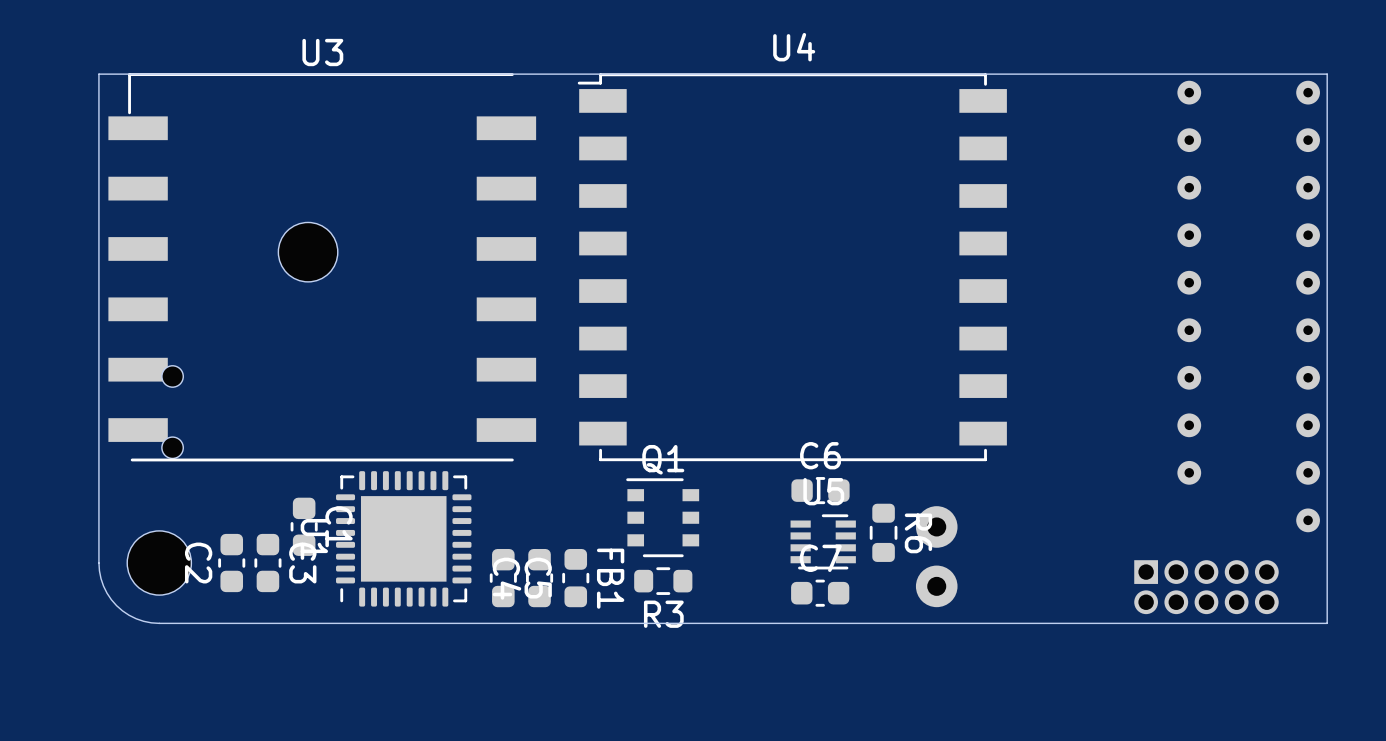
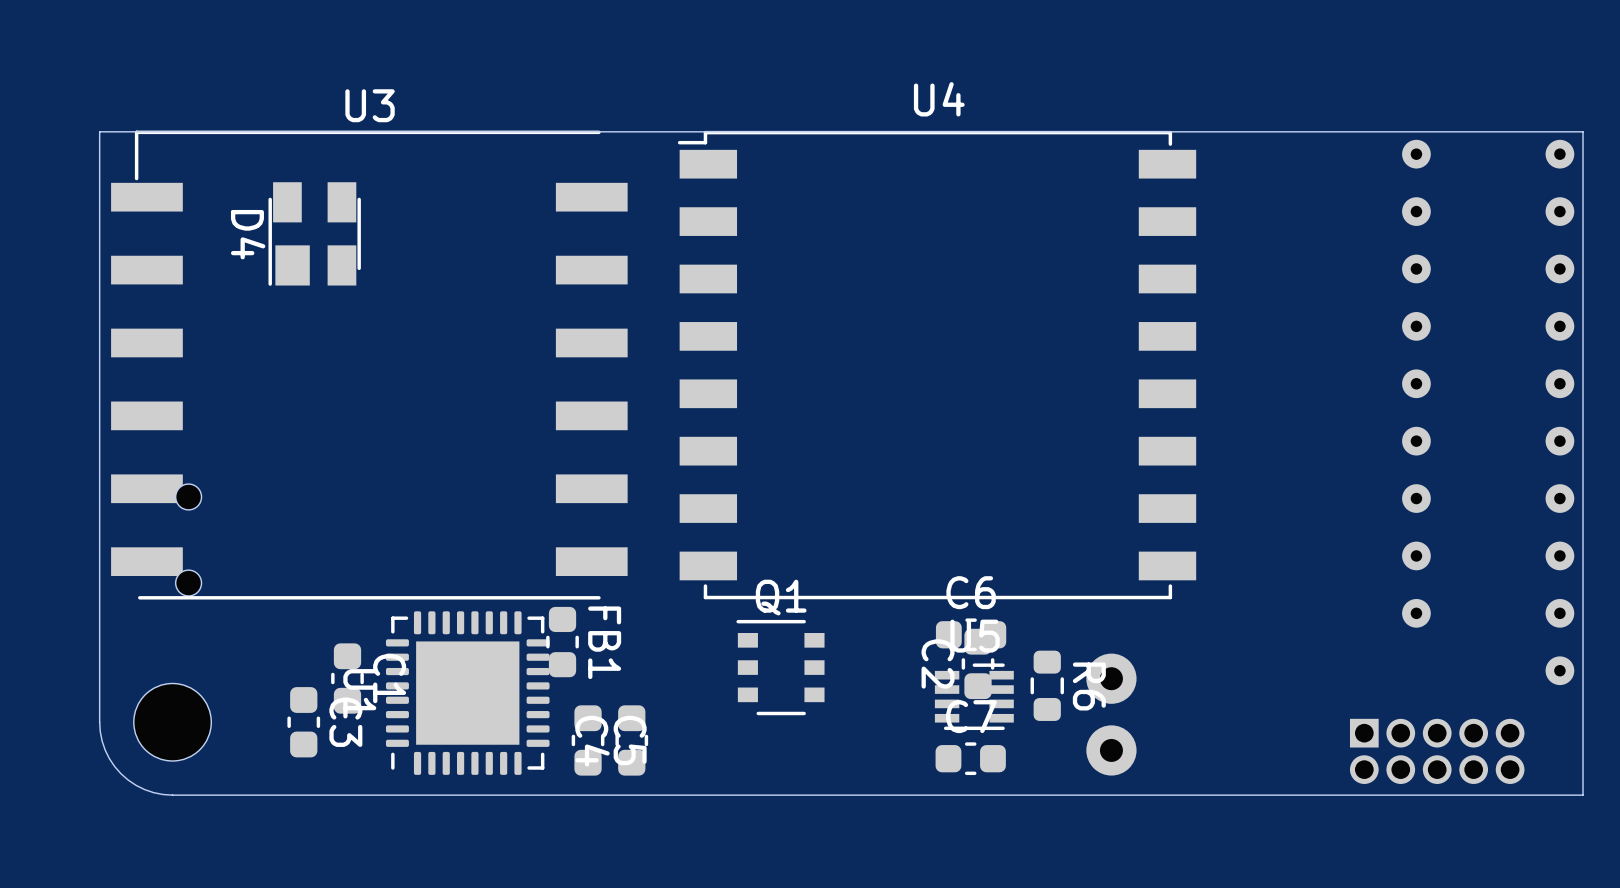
D4: none -> (314, 234)
part: (308, 252) -> none
C2 position: (231, 563) -> (978, 663)
FB1 position: (575, 578) -> (562, 642)
R3: (663, 581) -> none

